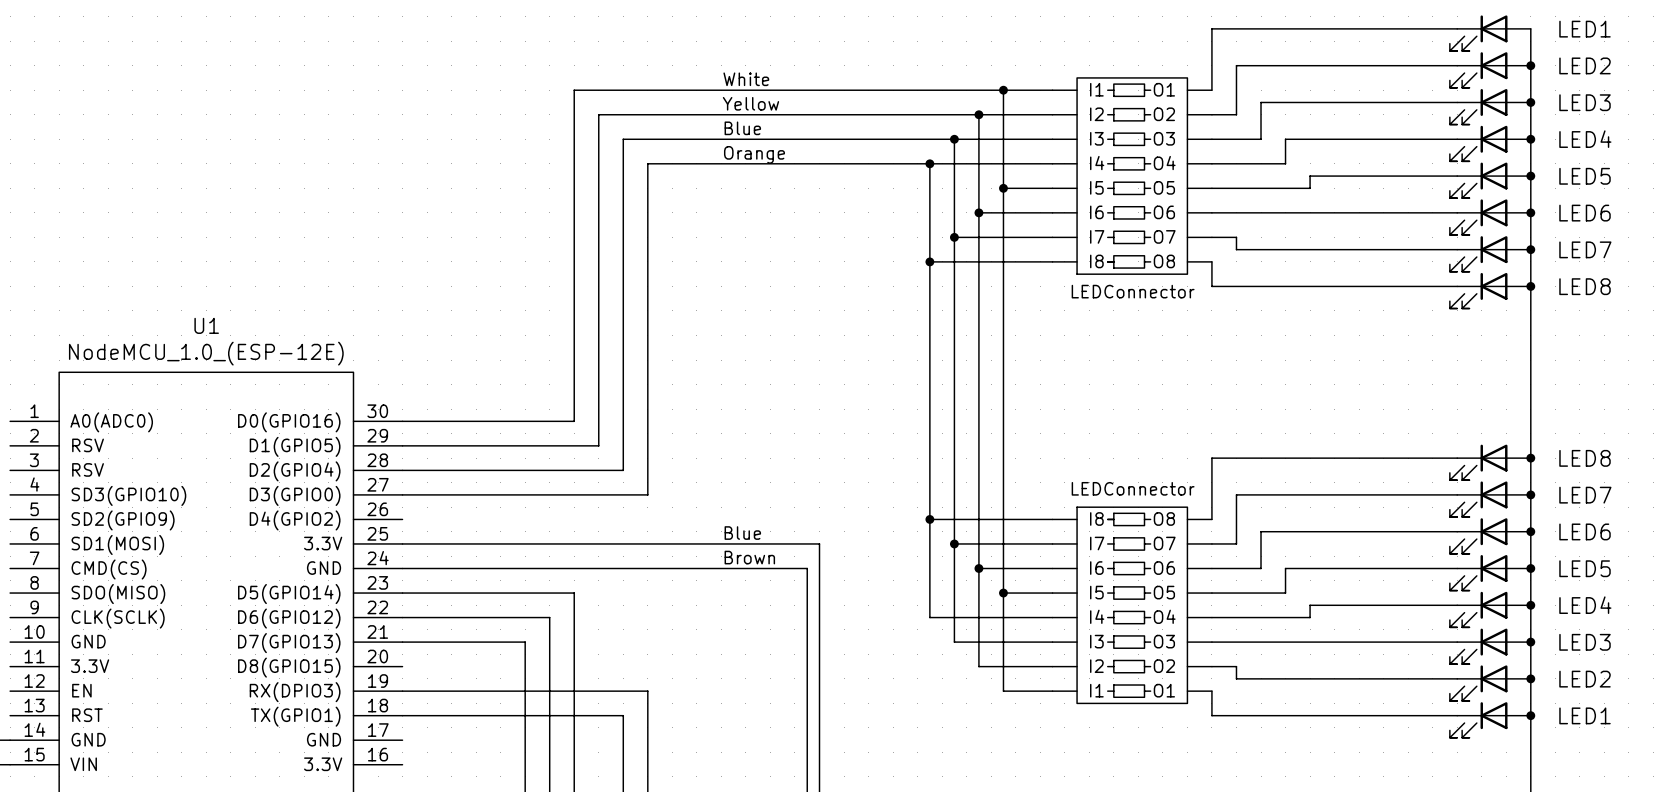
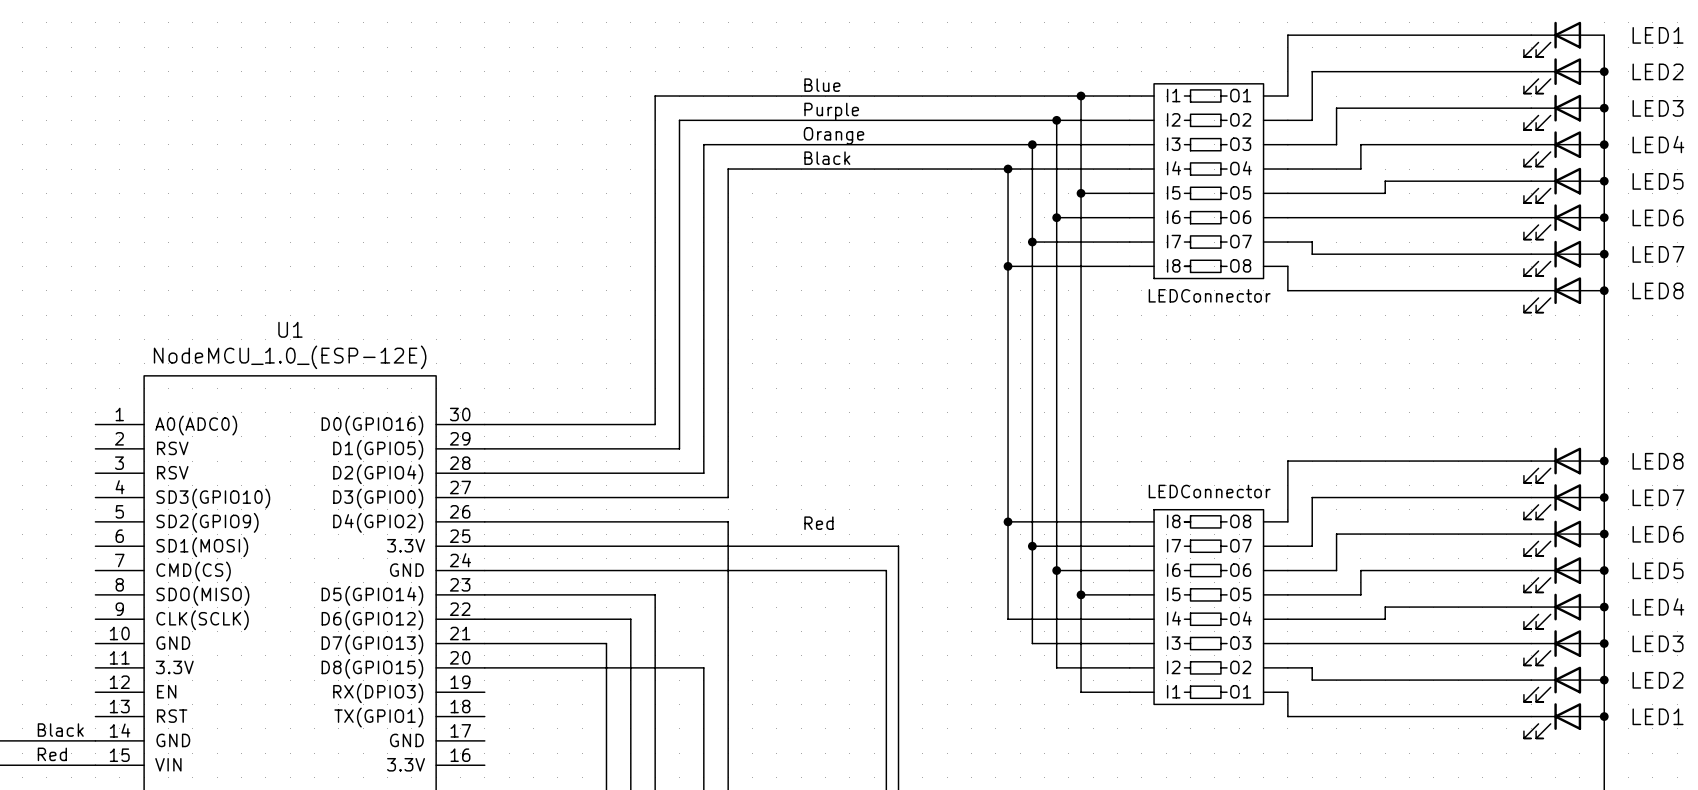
label: White (746, 79) -> Blue (822, 85)
label: Yellow (750, 103) -> Purple (831, 111)
label: Blue (742, 128) -> Orange (833, 135)
label: Orange (754, 154) -> Black (827, 158)
label: none -> Red (818, 523)
label: Blue (742, 533) -> none
label: Brown (749, 557) -> none
wire: (402, 691) (647, 691) -> (484, 521) (728, 521) (728, 692)
wire: (402, 715) (623, 715) -> (484, 667) (703, 667) (703, 716)

